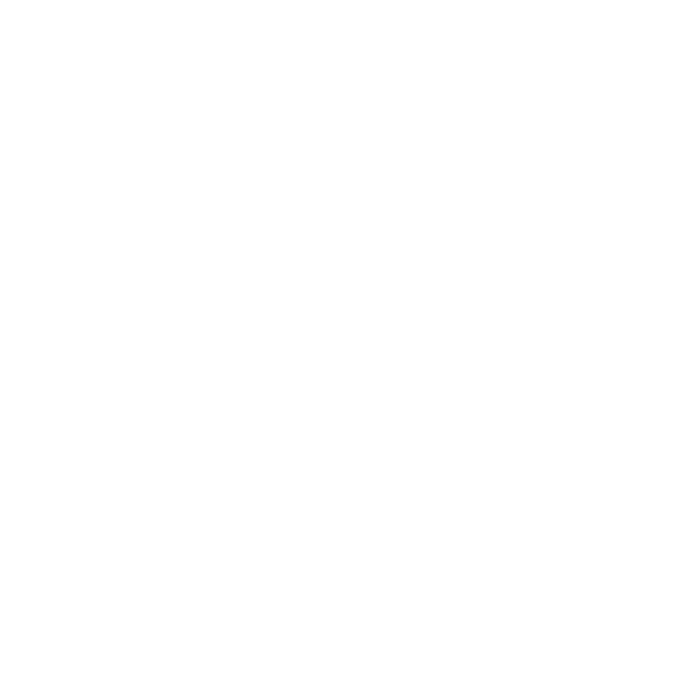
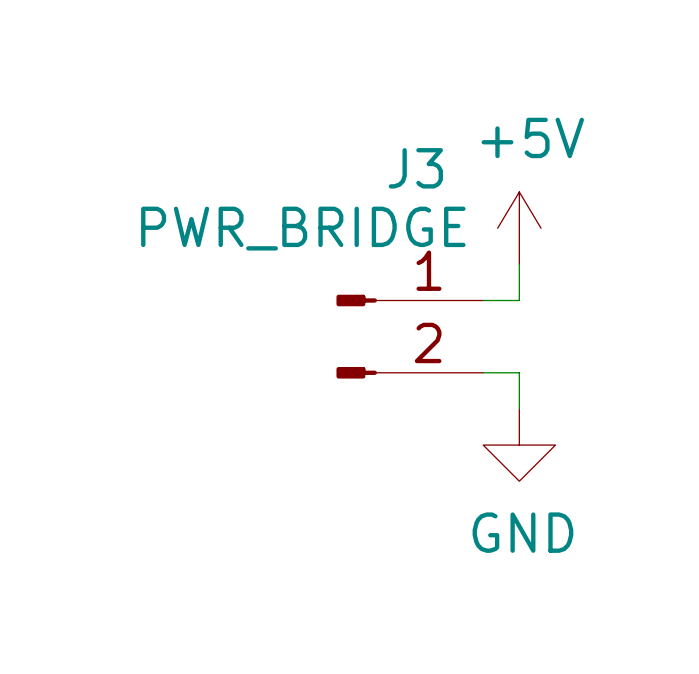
power symbol: none -> +5V (519, 228)
wire: none -> (519, 264) (519, 300) (483, 300)
J3: none -> PWR_BRIDGE (409, 336)
wire: none -> (483, 372) (519, 372) (519, 408)
power symbol: none -> GND (519, 445)

